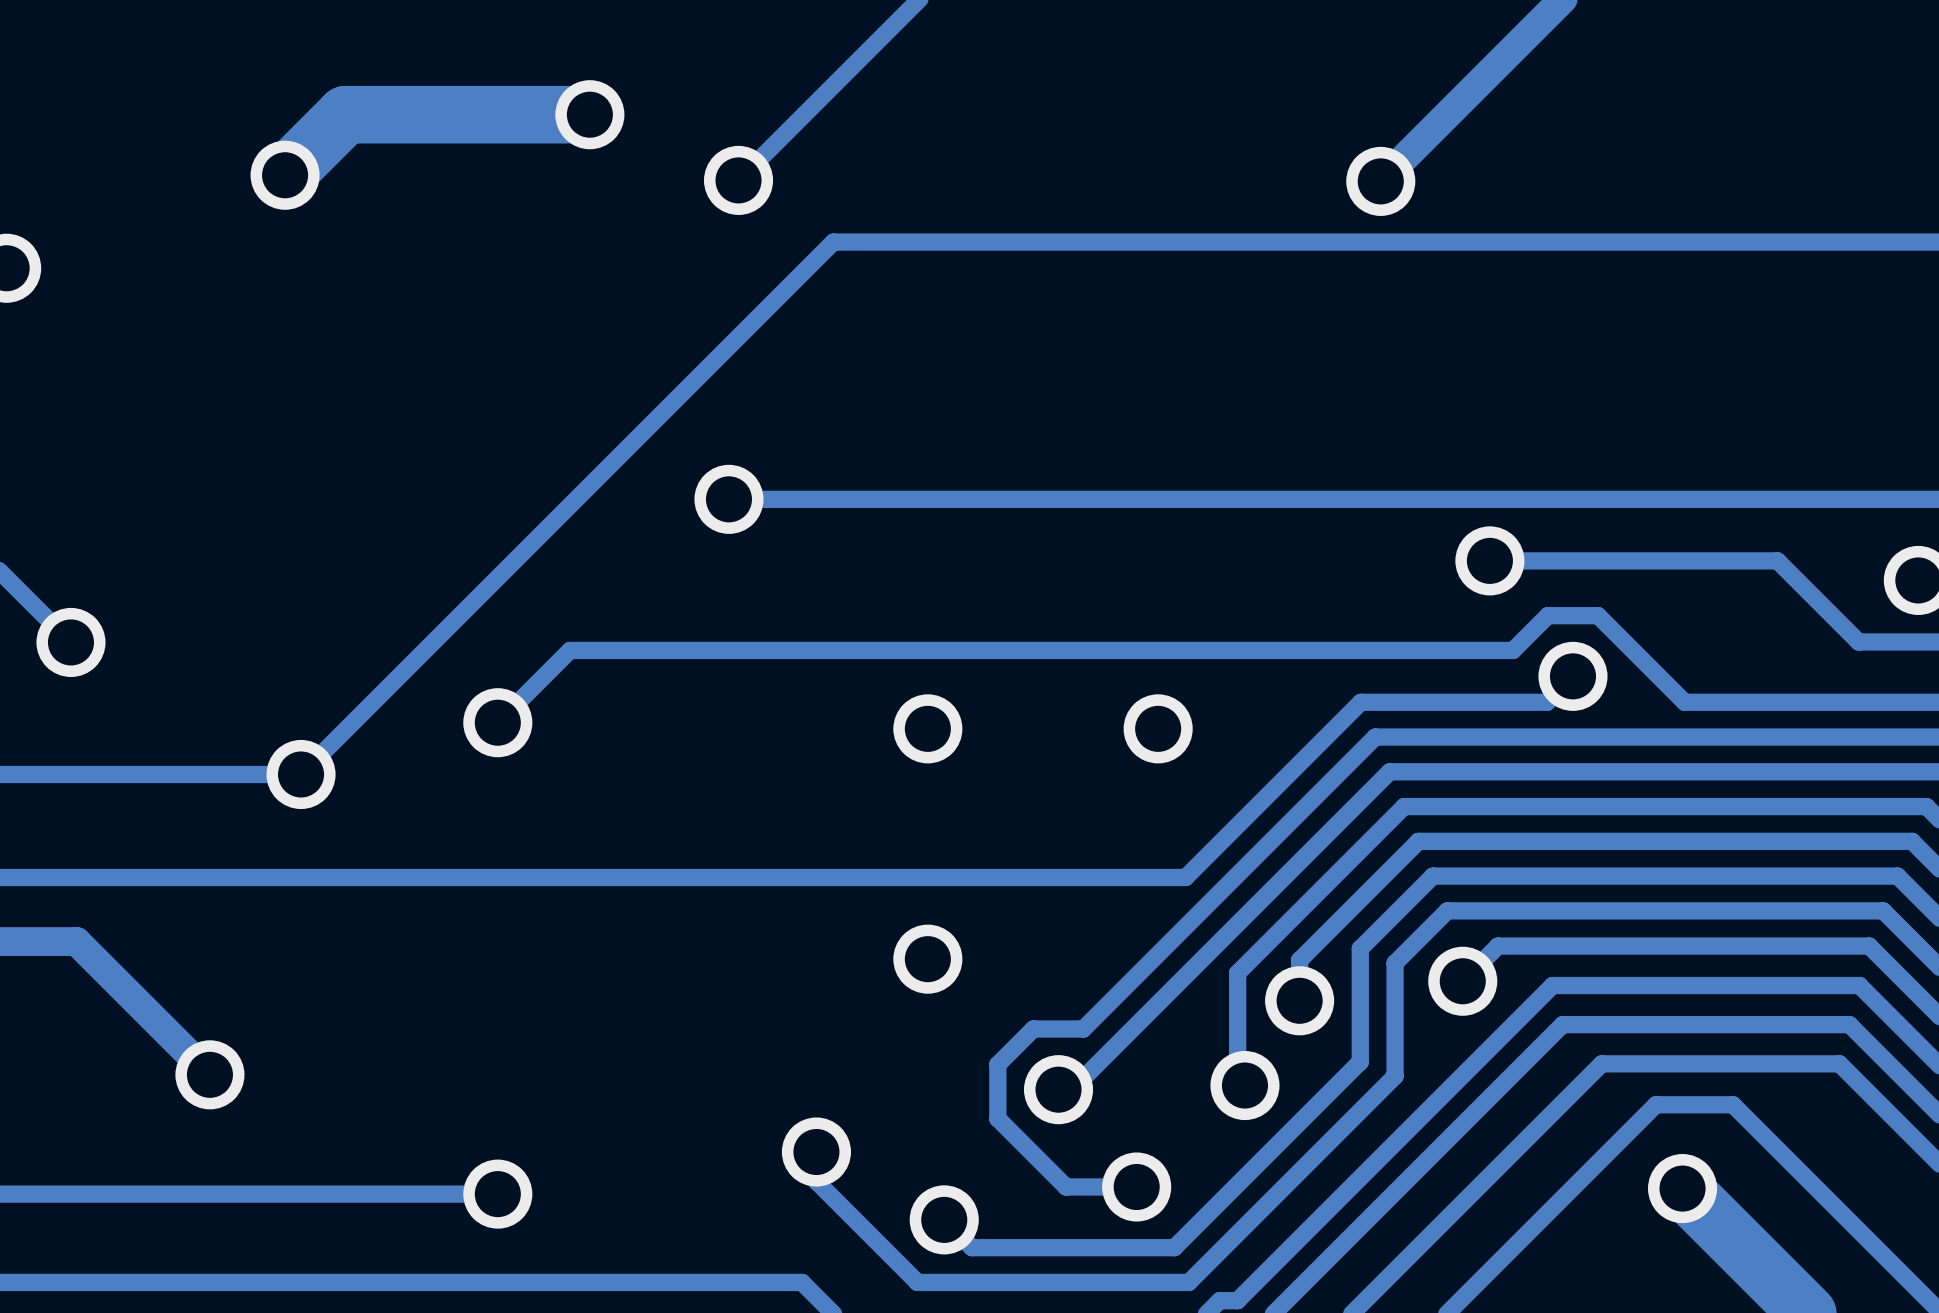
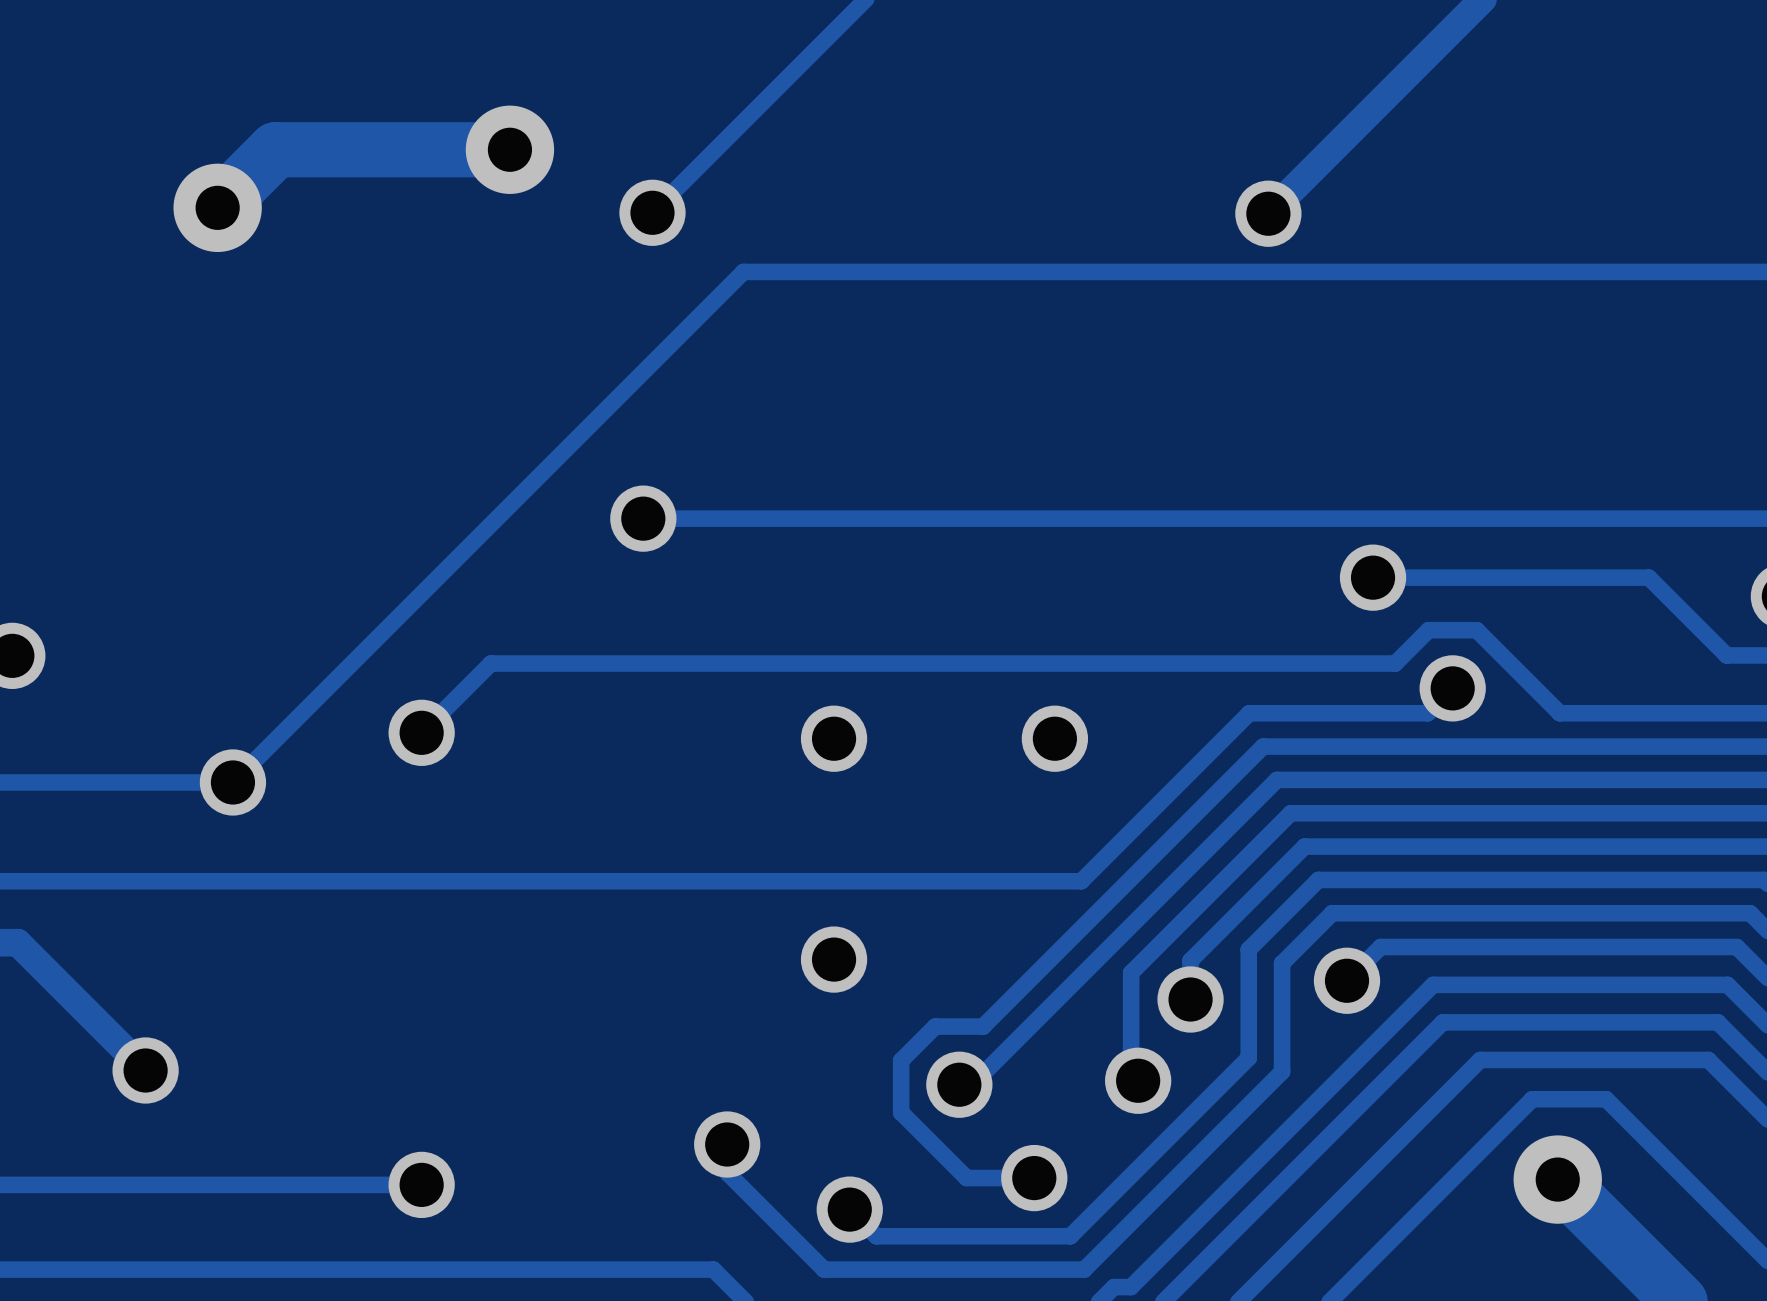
via size: [555, 80, 625, 150] -> [465, 105, 555, 194]
via size: [250, 140, 320, 210] -> [173, 163, 262, 253]
via size: [1647, 1154, 1718, 1224] -> [1513, 1135, 1602, 1224]

